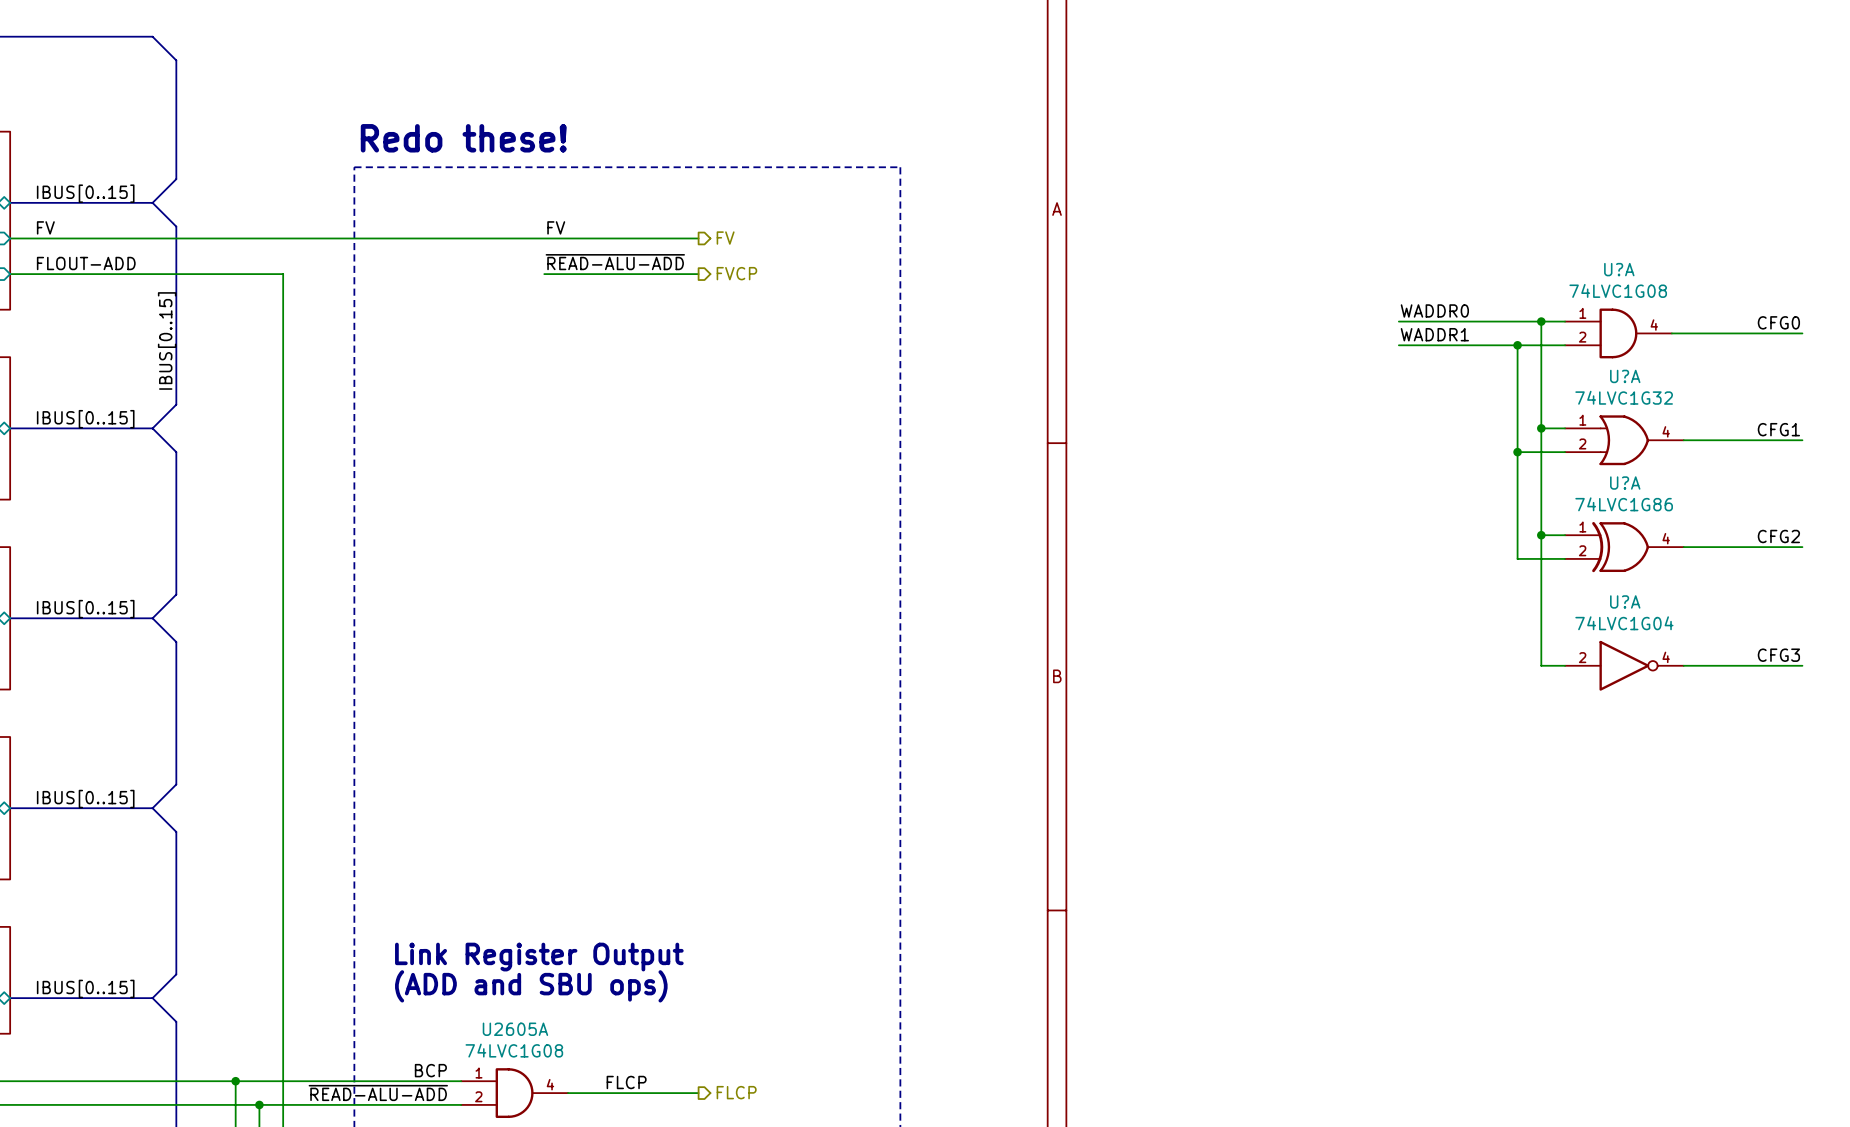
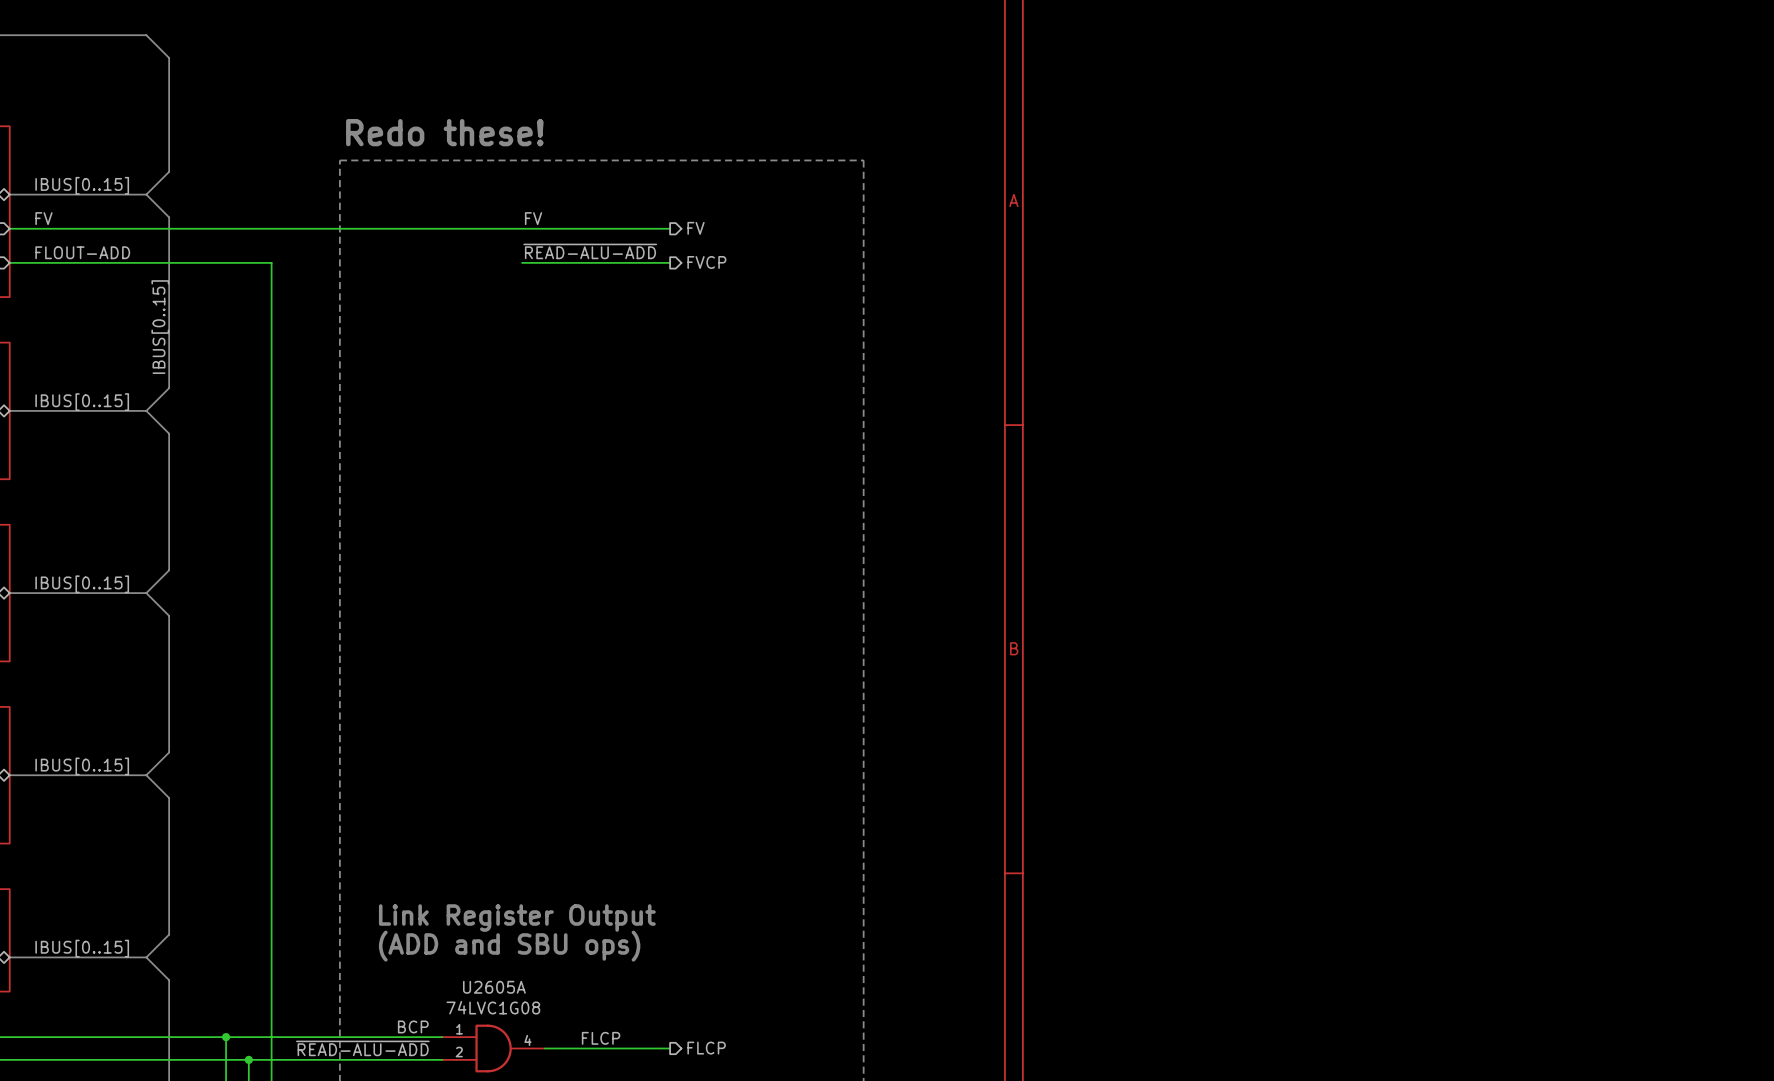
label: WADDR0 (1434, 310) -> none
wire: (1398, 321) (1565, 321) -> none
wire: (1541, 321) (1541, 665) (1565, 665) -> none
junction: (1541, 321) -> none
label: CFG0 (1778, 322) -> none
U?A: 74LVC1G08 (1618, 333) -> none
wire: (1671, 333) (1802, 333) -> none
label: WADDR1 (1434, 334) -> none
wire: (1398, 345) (1565, 345) -> none
wire: (1517, 345) (1517, 558) (1565, 558) -> none
junction: (1517, 345) -> none
wire: (1541, 428) (1565, 428) -> none
junction: (1541, 428) -> none
label: CFG1 (1778, 429) -> none
U?A: 74LVC1G32 (1624, 440) -> none
wire: (1683, 440) (1802, 440) -> none
wire: (1517, 452) (1565, 452) -> none
junction: (1517, 452) -> none
wire: (1541, 535) (1565, 535) -> none
junction: (1541, 535) -> none
label: CFG2 (1778, 536) -> none
U?A: 74LVC1G86 (1624, 547) -> none
wire: (1683, 547) (1802, 547) -> none
label: CFG3 (1778, 655) -> none
U?A: 74LVC1G04 (1624, 665) -> none
wire: (1683, 665) (1802, 665) -> none

